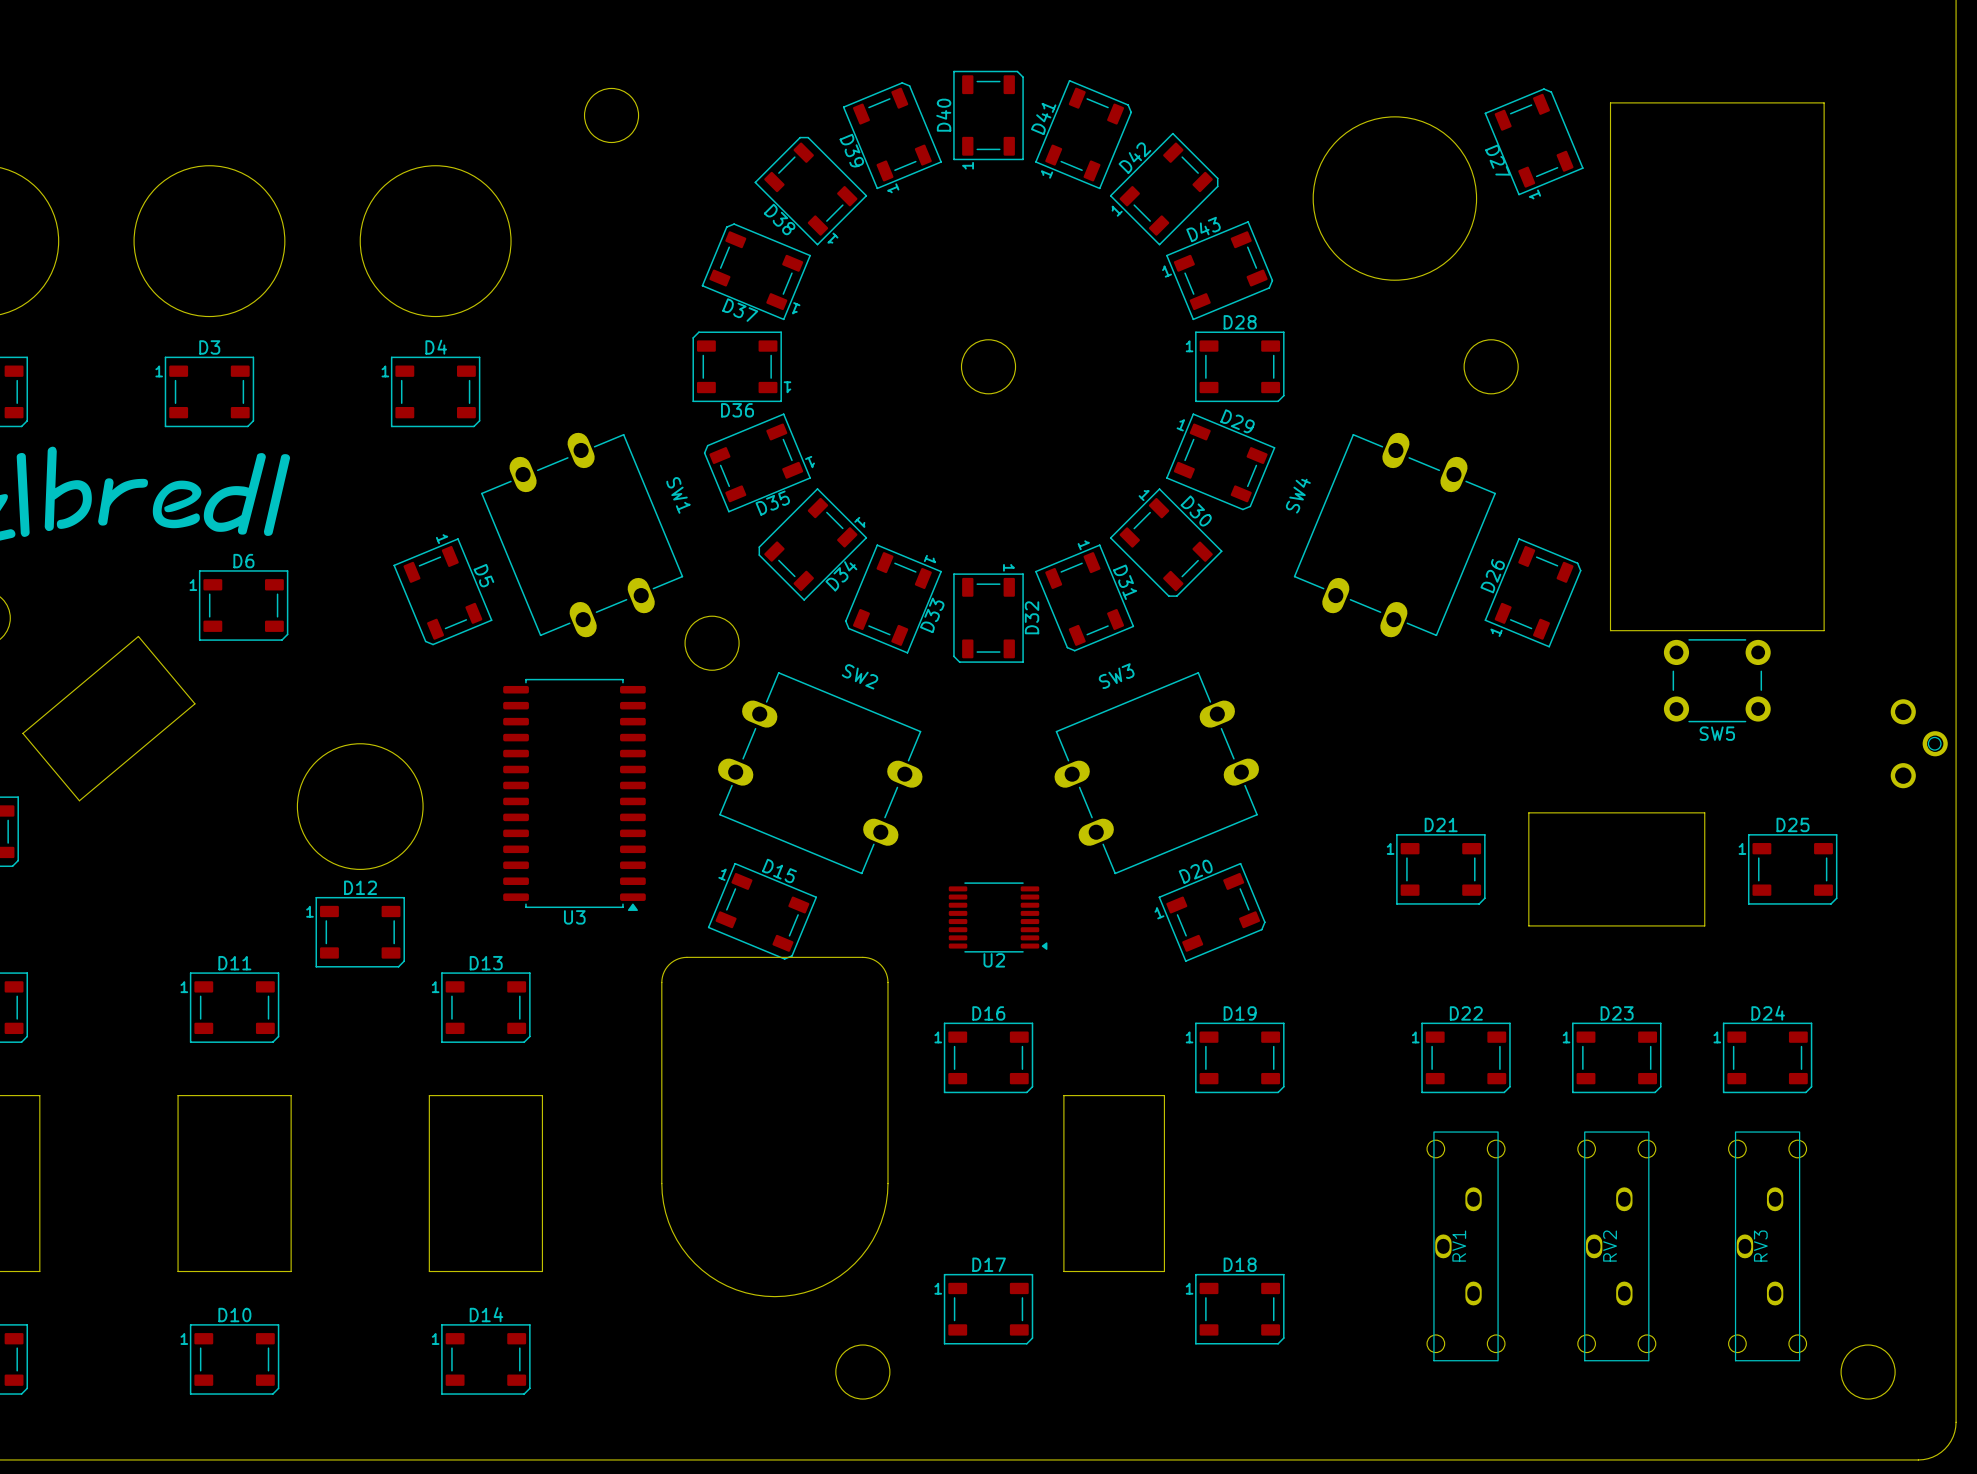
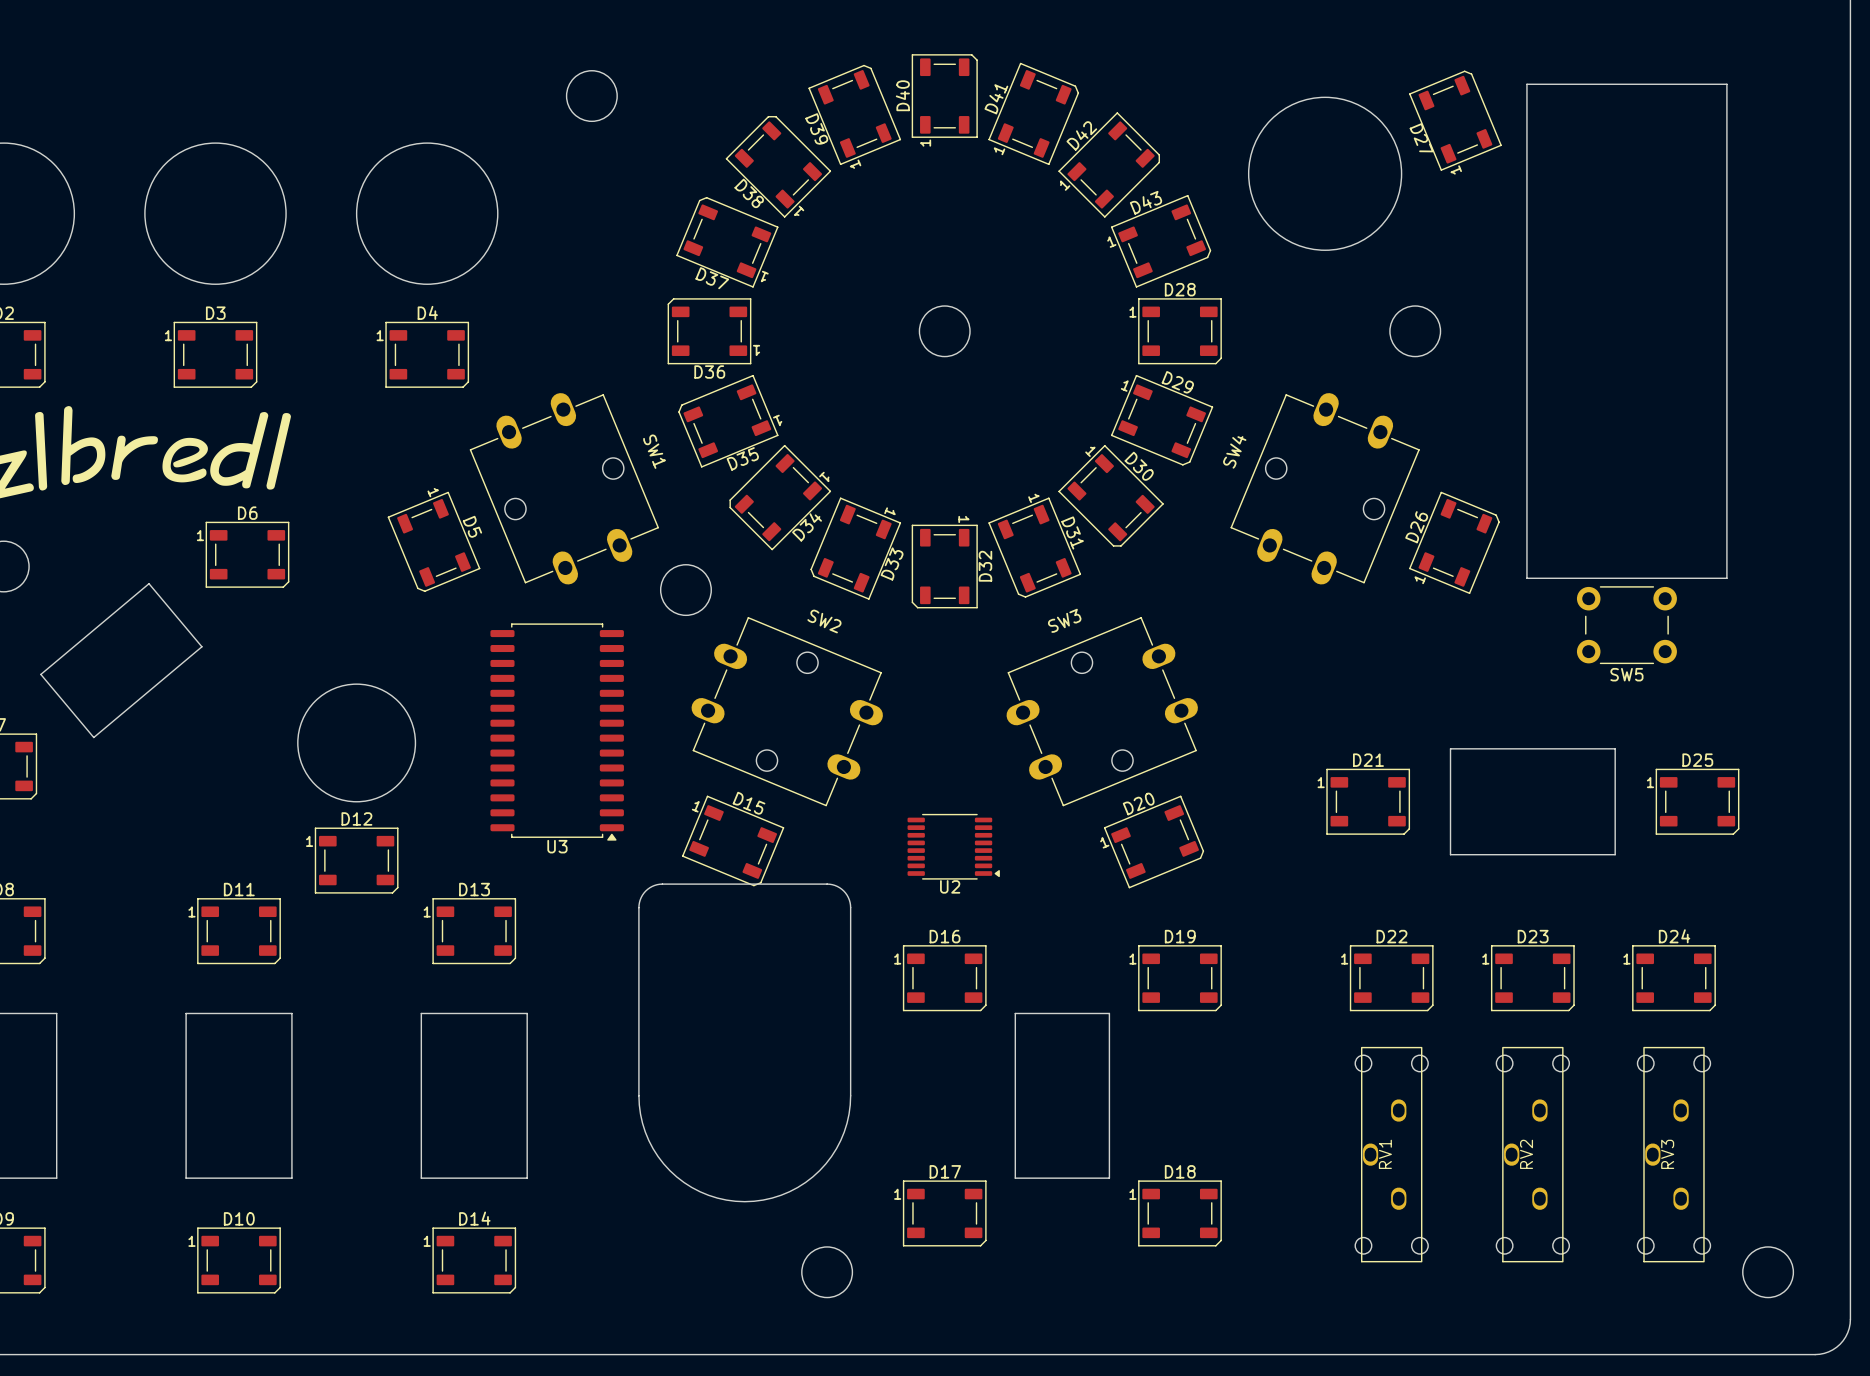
SW1 footprint: [481, 432, 684, 638] -> [469, 393, 659, 585]
SW4 footprint: [1293, 432, 1496, 638] -> [1230, 393, 1420, 585]
SW2 footprint: [718, 672, 923, 875] -> [691, 617, 883, 807]
SW3 footprint: [1054, 672, 1259, 875] -> [1006, 617, 1198, 807]
drawing: [1927, 736, 1942, 751] -> none
part: (1919, 743) -> none

